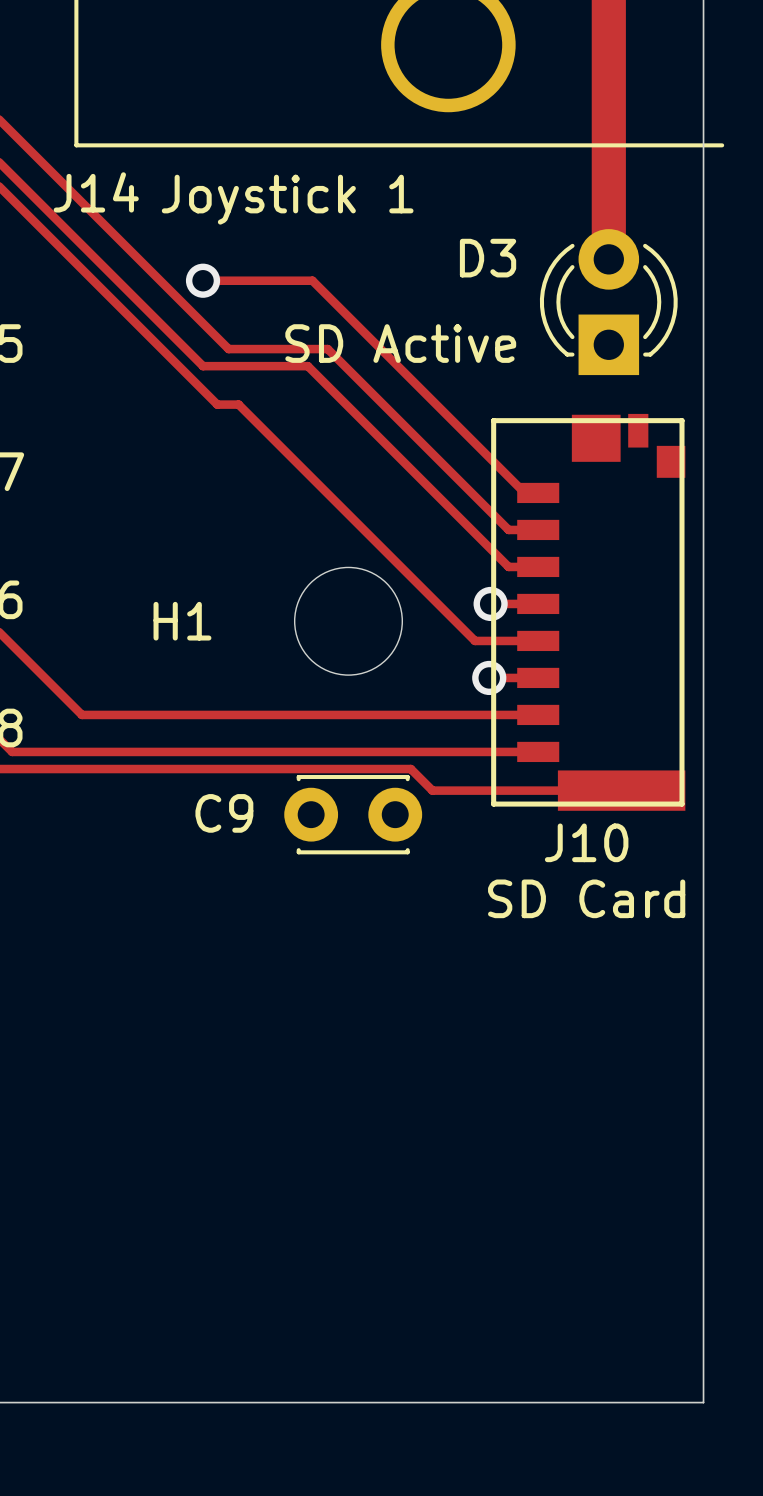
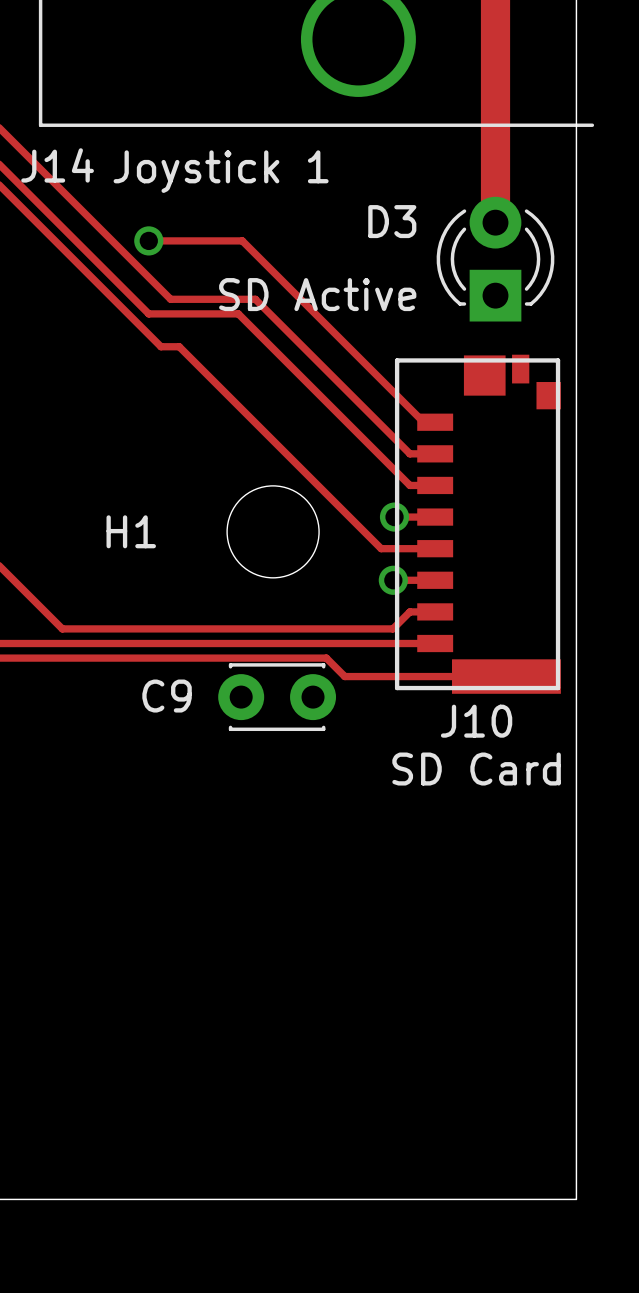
track: (81, 714) (508, 714) -> (45, 611) (62, 628) (392, 628) (409, 611)

